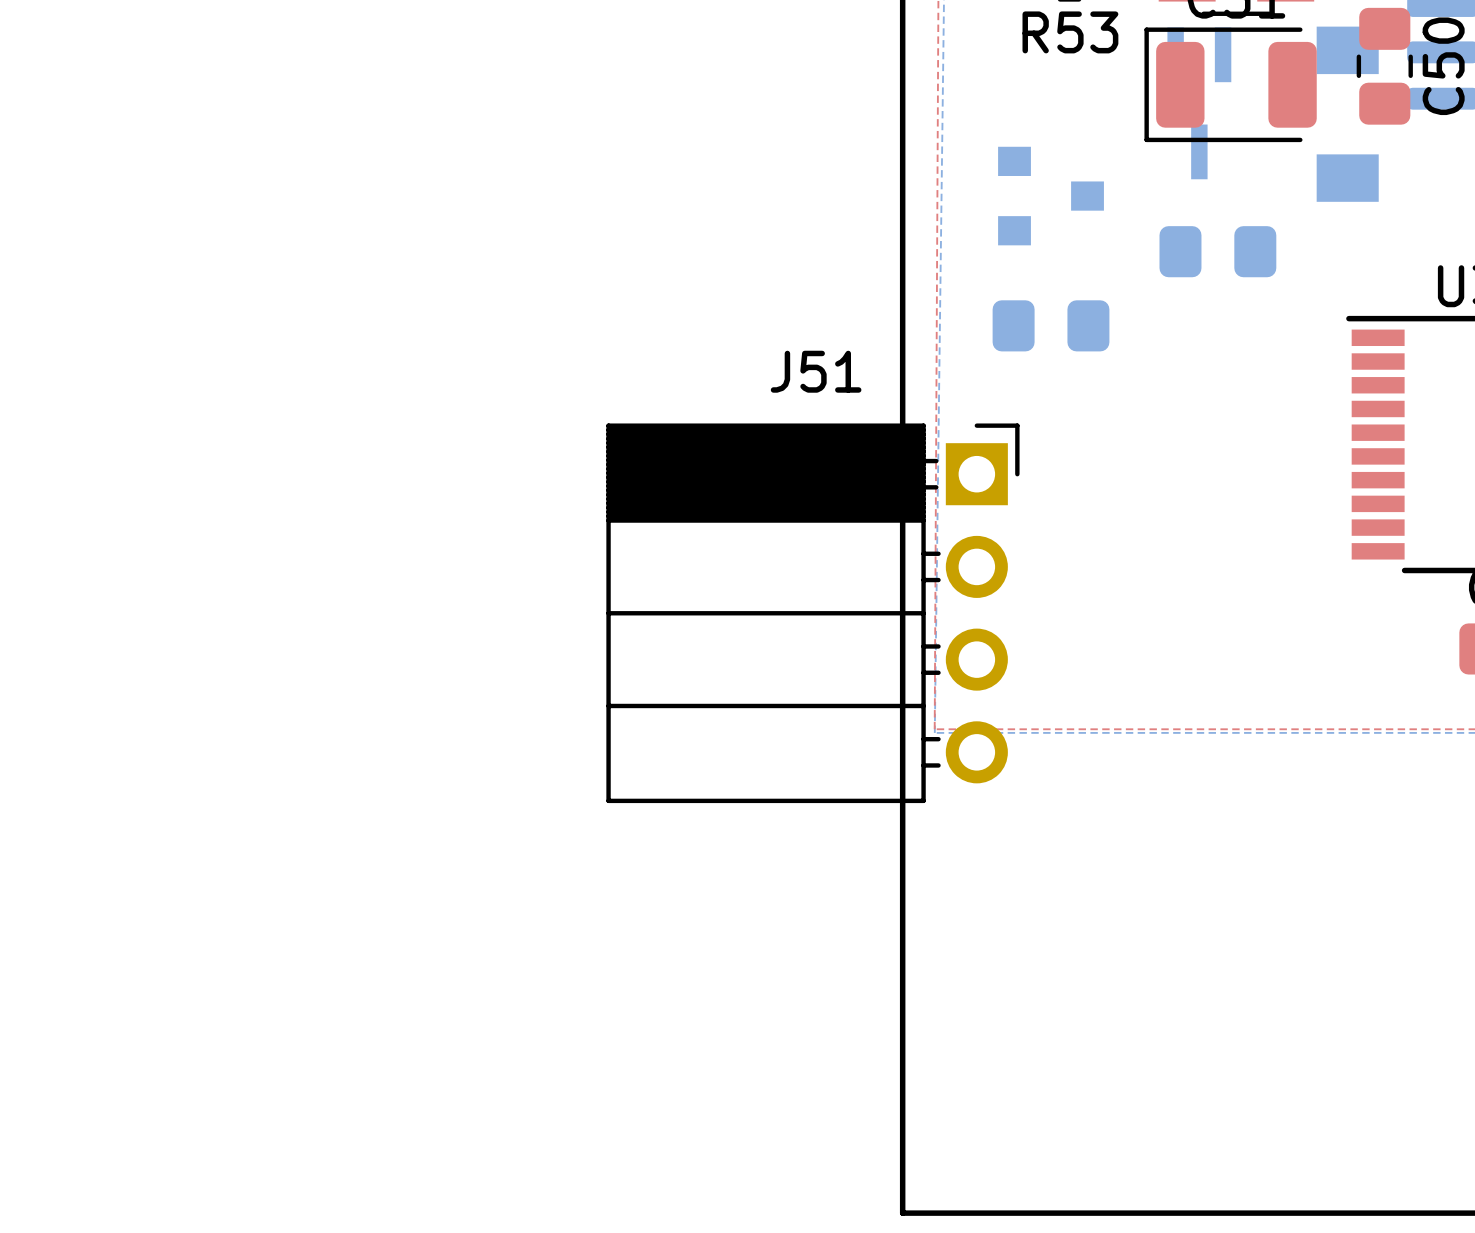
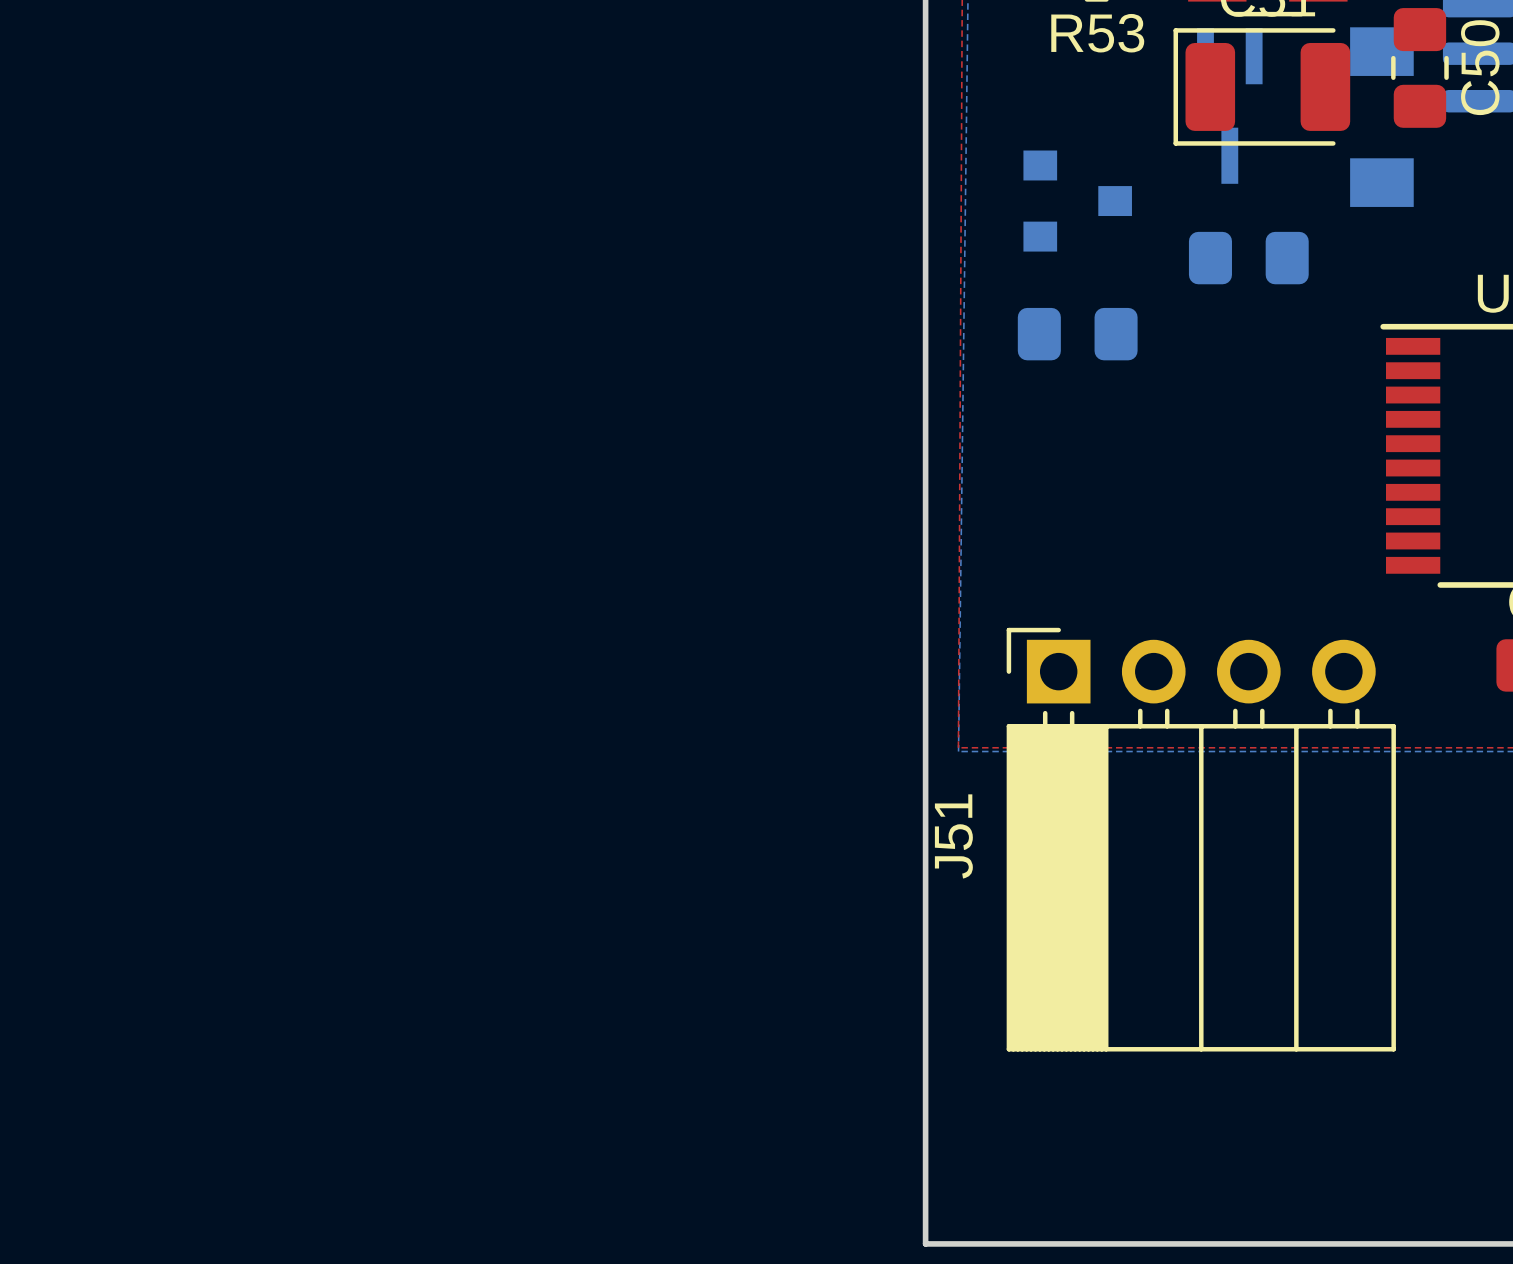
J51 rotation: 0° (812, 613) -> 90° counterclockwise (1201, 839)
J51 position: (812, 613) -> (1201, 839)

